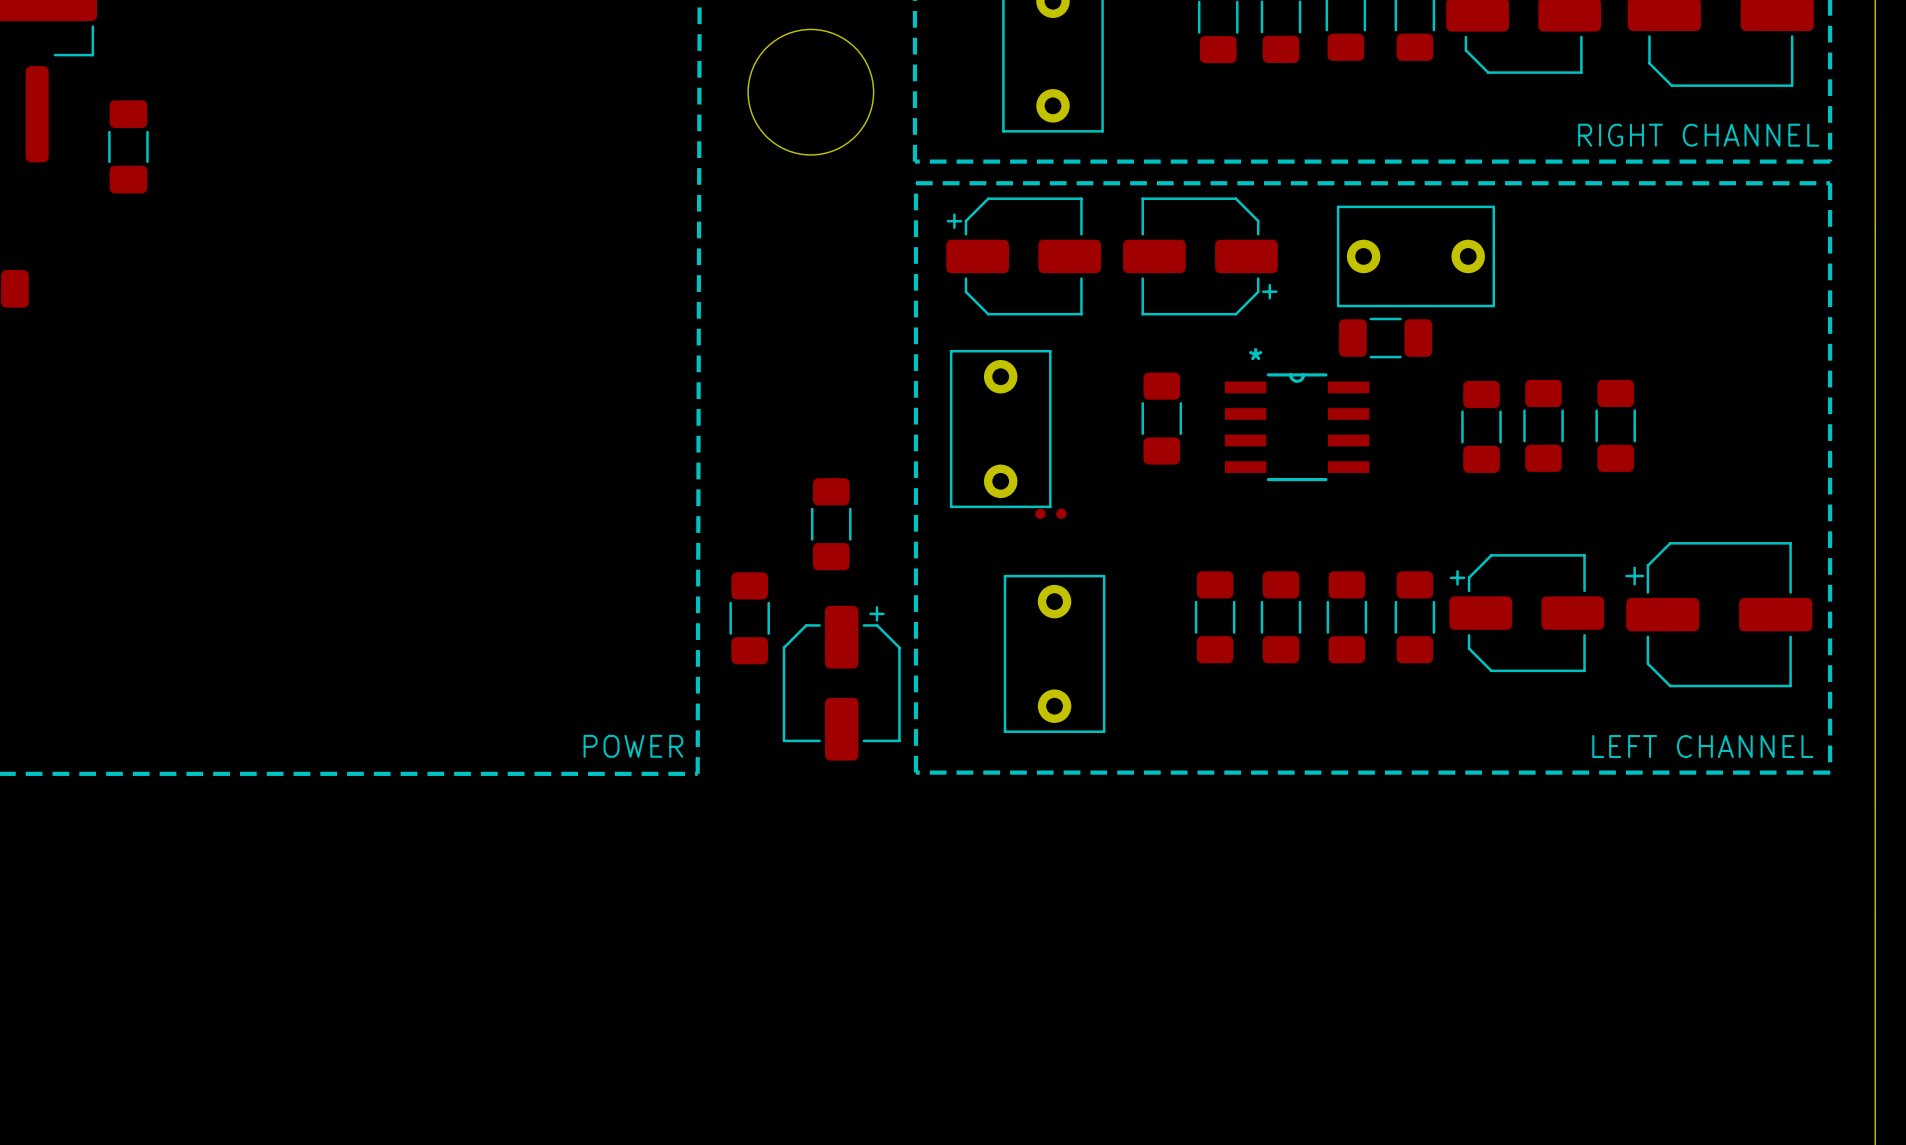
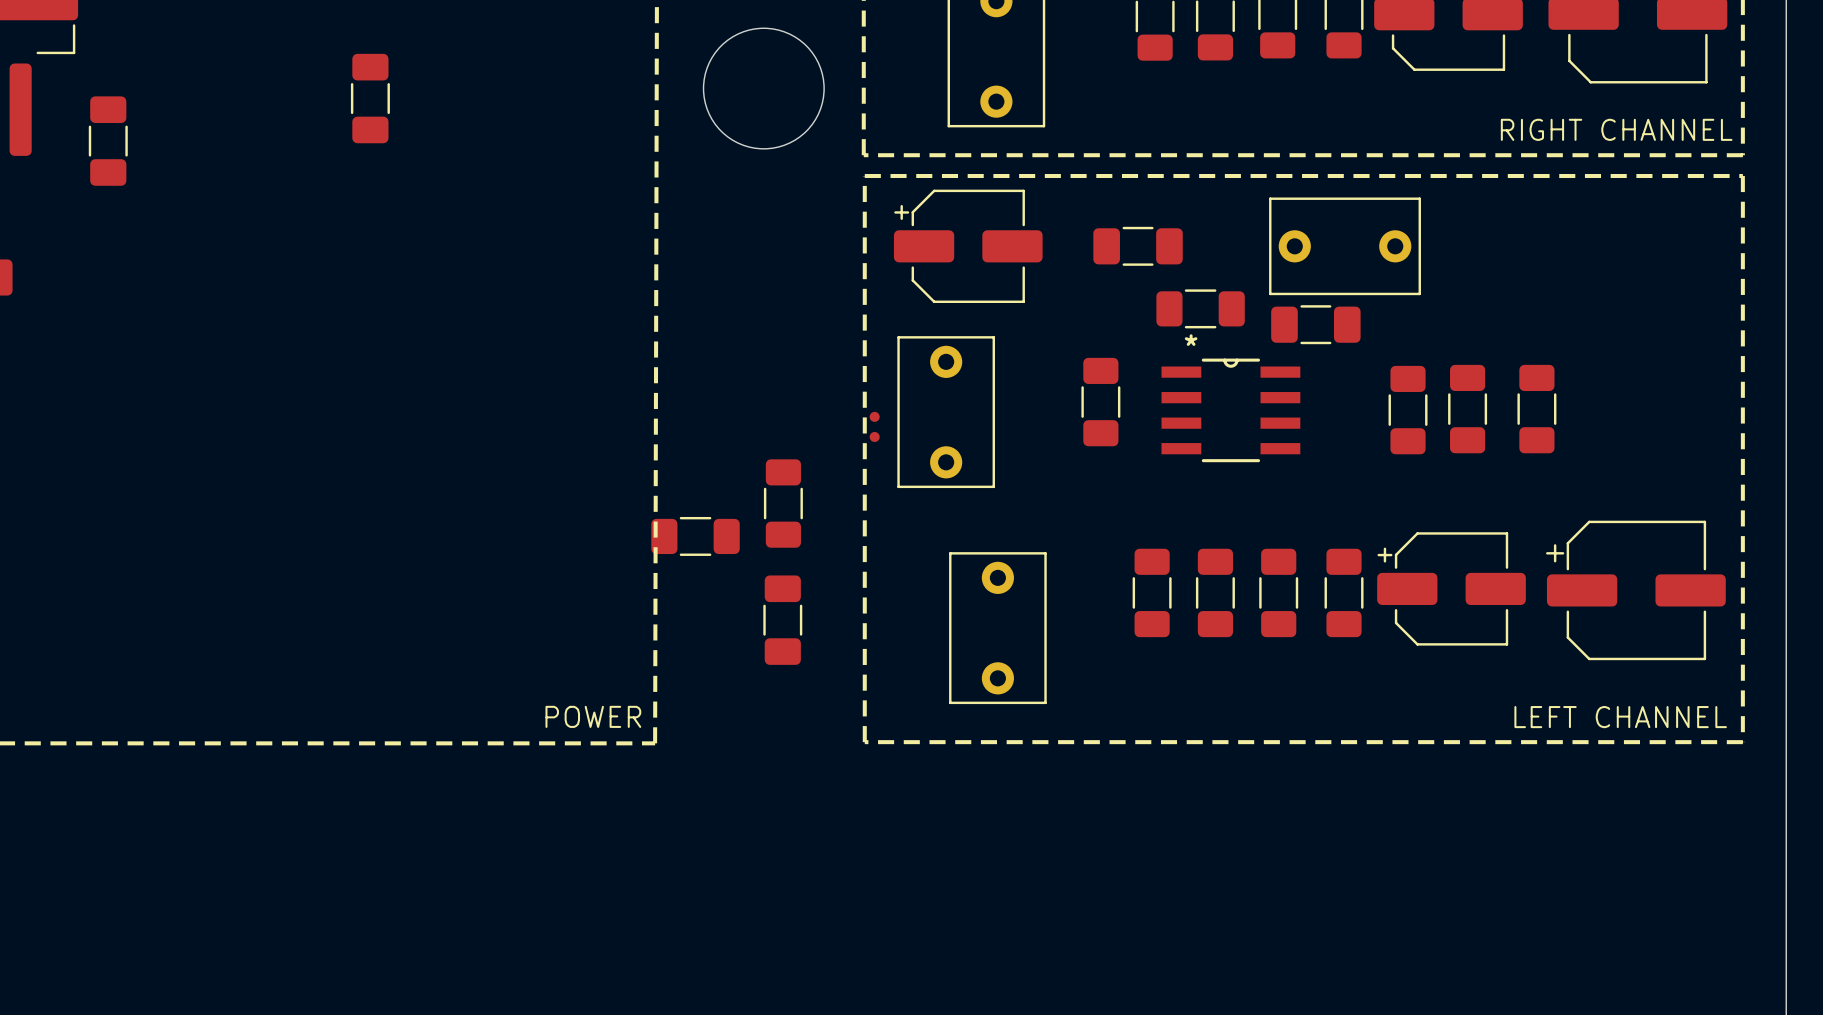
part: none -> (370, 98)
part footprint: [1123, 197, 1278, 316] -> [1093, 226, 1183, 266]
part: none -> (1200, 308)
part rotation: 0° (1050, 513) -> 90° clockwise (874, 426)
part position: (1050, 513) -> (874, 426)
part rotation: 0° (749, 618) -> 90° clockwise (695, 536)
part position: (749, 618) -> (695, 536)
part: none -> (782, 620)
part: (841, 683) -> none

